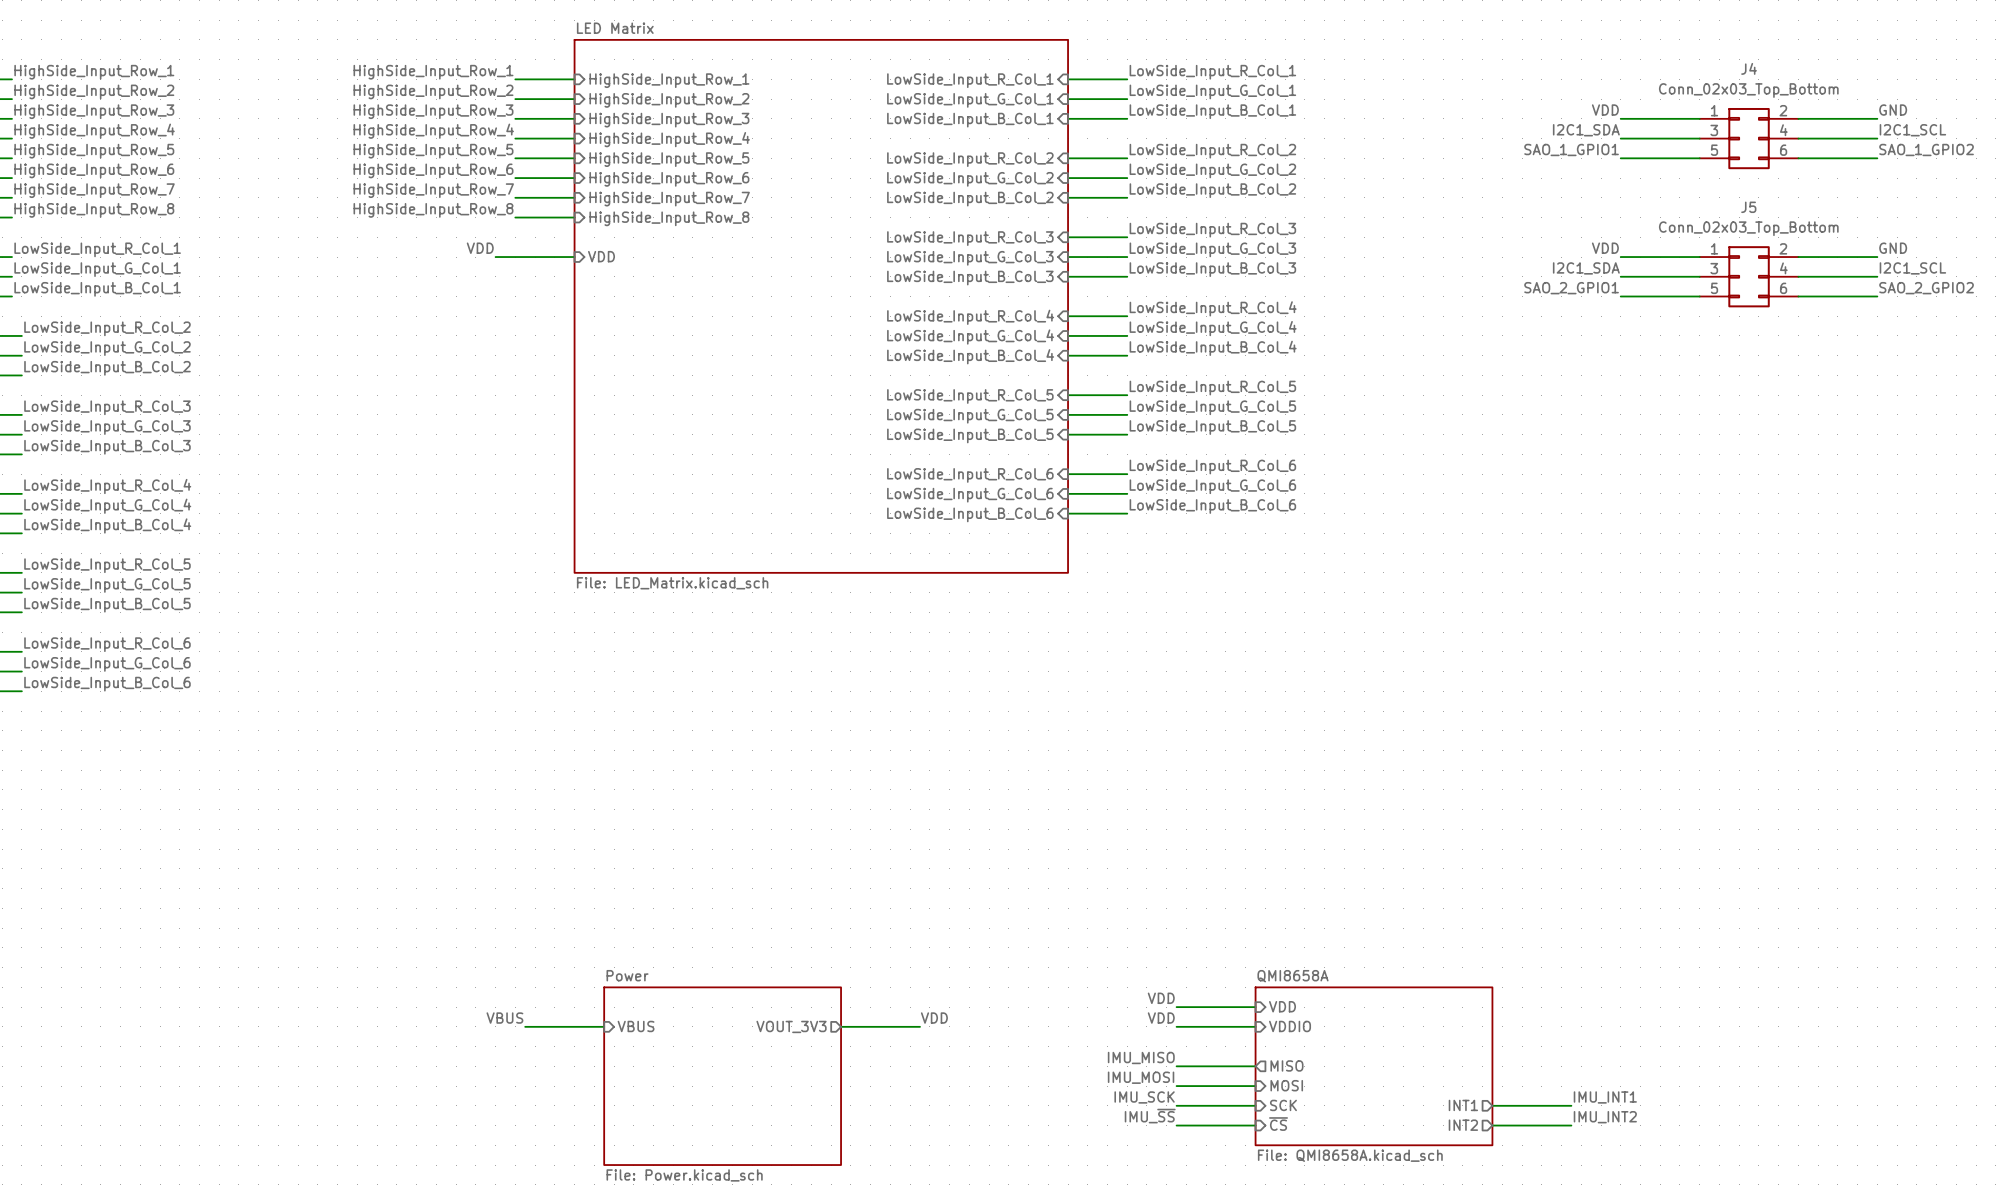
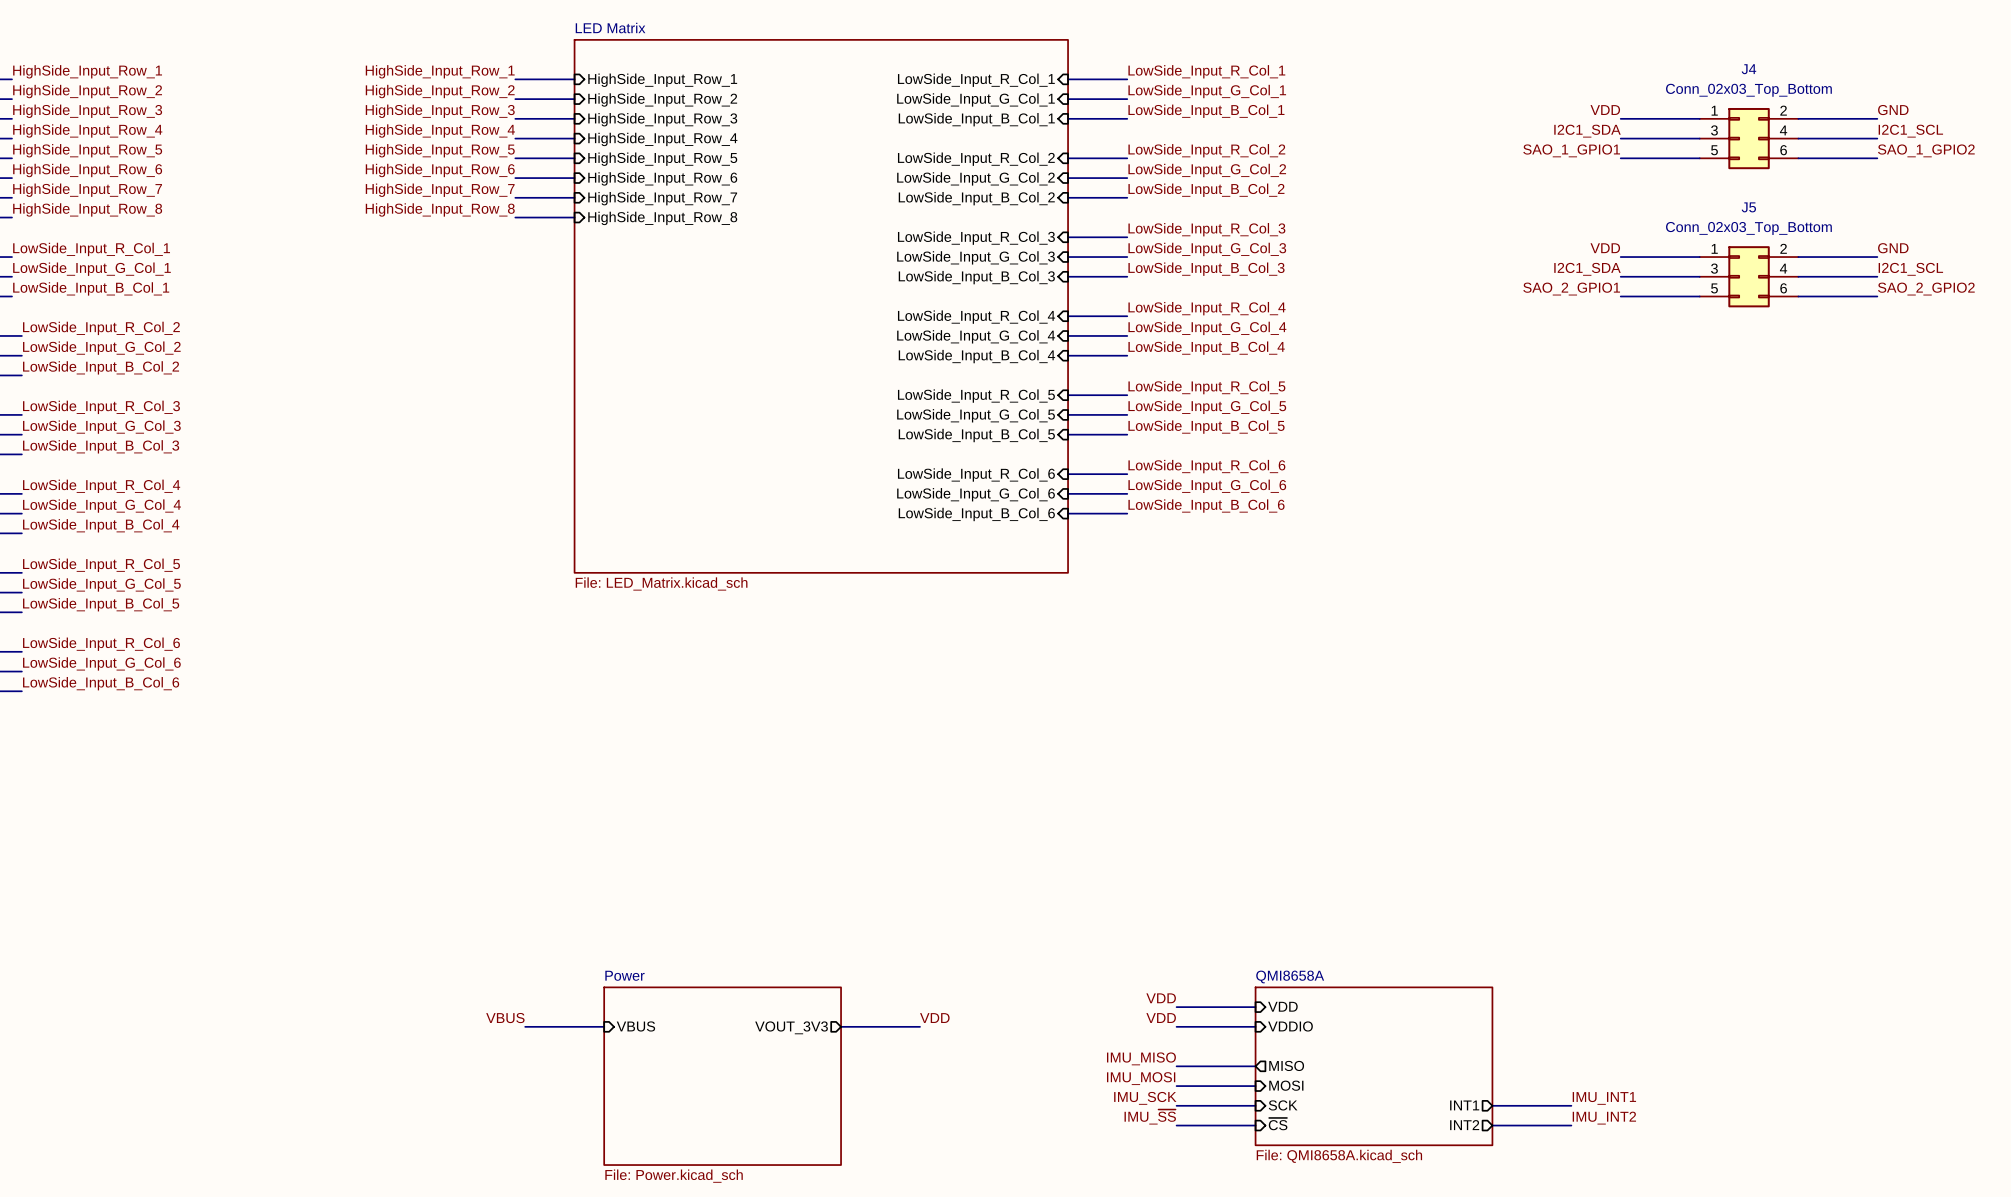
label: VDD (480, 248) -> none
sheet pin: VDD (601, 256) -> none
wire: (495, 257) (574, 257) -> none

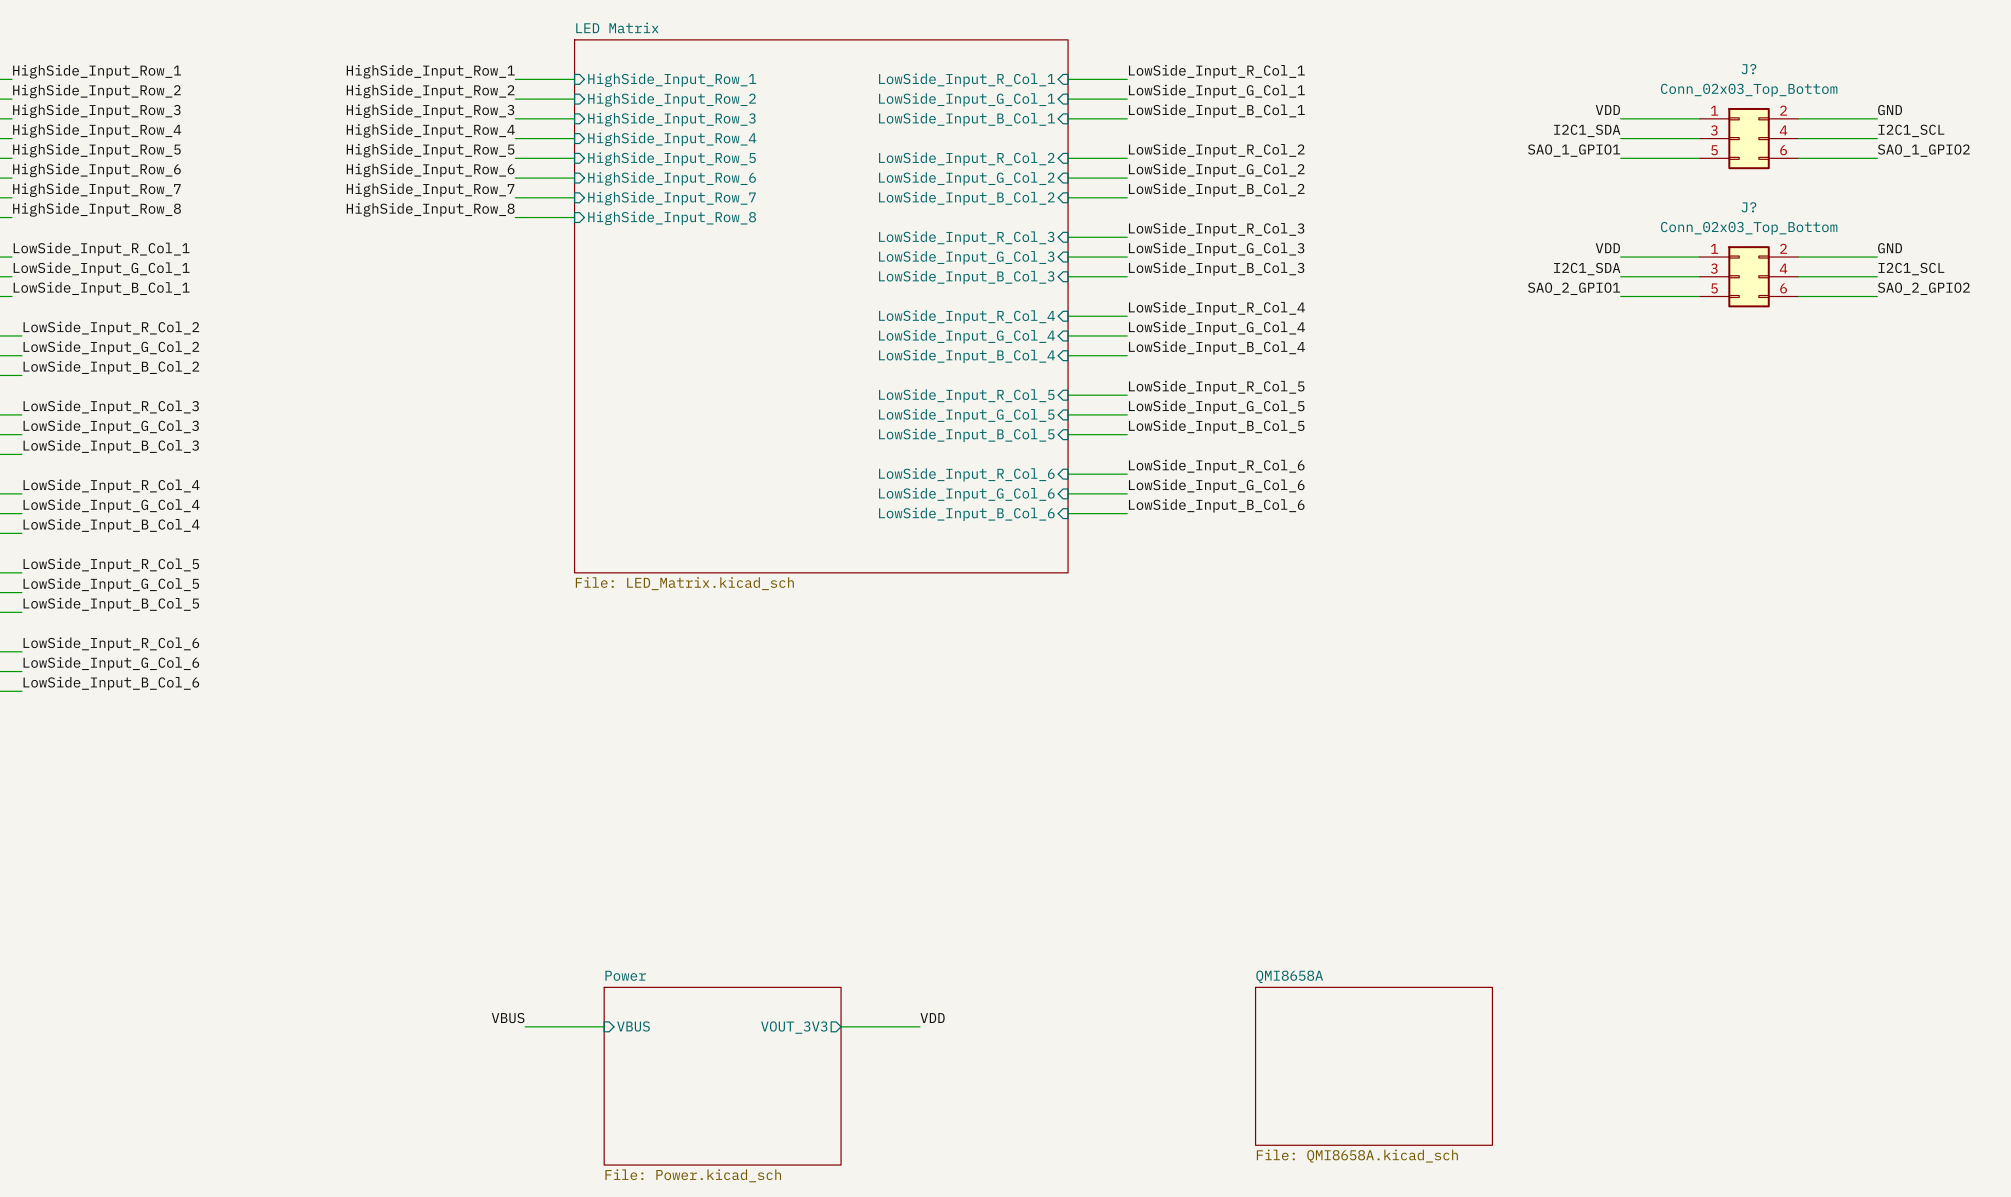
J4 name: J4 (1748, 69) -> J? (1748, 69)
J5 name: J5 (1748, 207) -> J? (1748, 207)
label: VDD (1161, 998) -> none
sheet pin: VDD (1282, 1006) -> none
wire: (1176, 1007) (1255, 1007) -> none
label: VDD (1161, 1018) -> none
wire: (1176, 1026) (1255, 1026) -> none
sheet pin: VDDIO (1290, 1026) -> none
label: IMU_MISO (1141, 1058) -> none
sheet pin: MISO (1286, 1065) -> none
wire: (1176, 1066) (1255, 1066) -> none
label: IMU_MOSI (1141, 1078) -> none
sheet pin: MOSI (1286, 1085) -> none
wire: (1176, 1086) (1255, 1086) -> none
label: IMU_SCK (1145, 1098) -> none
label: IMU_INT1 (1604, 1098) -> none
wire: (1176, 1105) (1255, 1105) -> none
sheet pin: SCK (1283, 1105) -> none
sheet pin: INT1 (1464, 1105) -> none
wire: (1492, 1105) (1571, 1105) -> none
label: IMU_~{SS} (1150, 1117) -> none
label: IMU_INT2 (1604, 1118) -> none
sheet pin: ~{CS} (1278, 1124) -> none
wire: (1176, 1125) (1255, 1125) -> none
sheet pin: INT2 (1464, 1125) -> none
wire: (1492, 1125) (1571, 1125) -> none

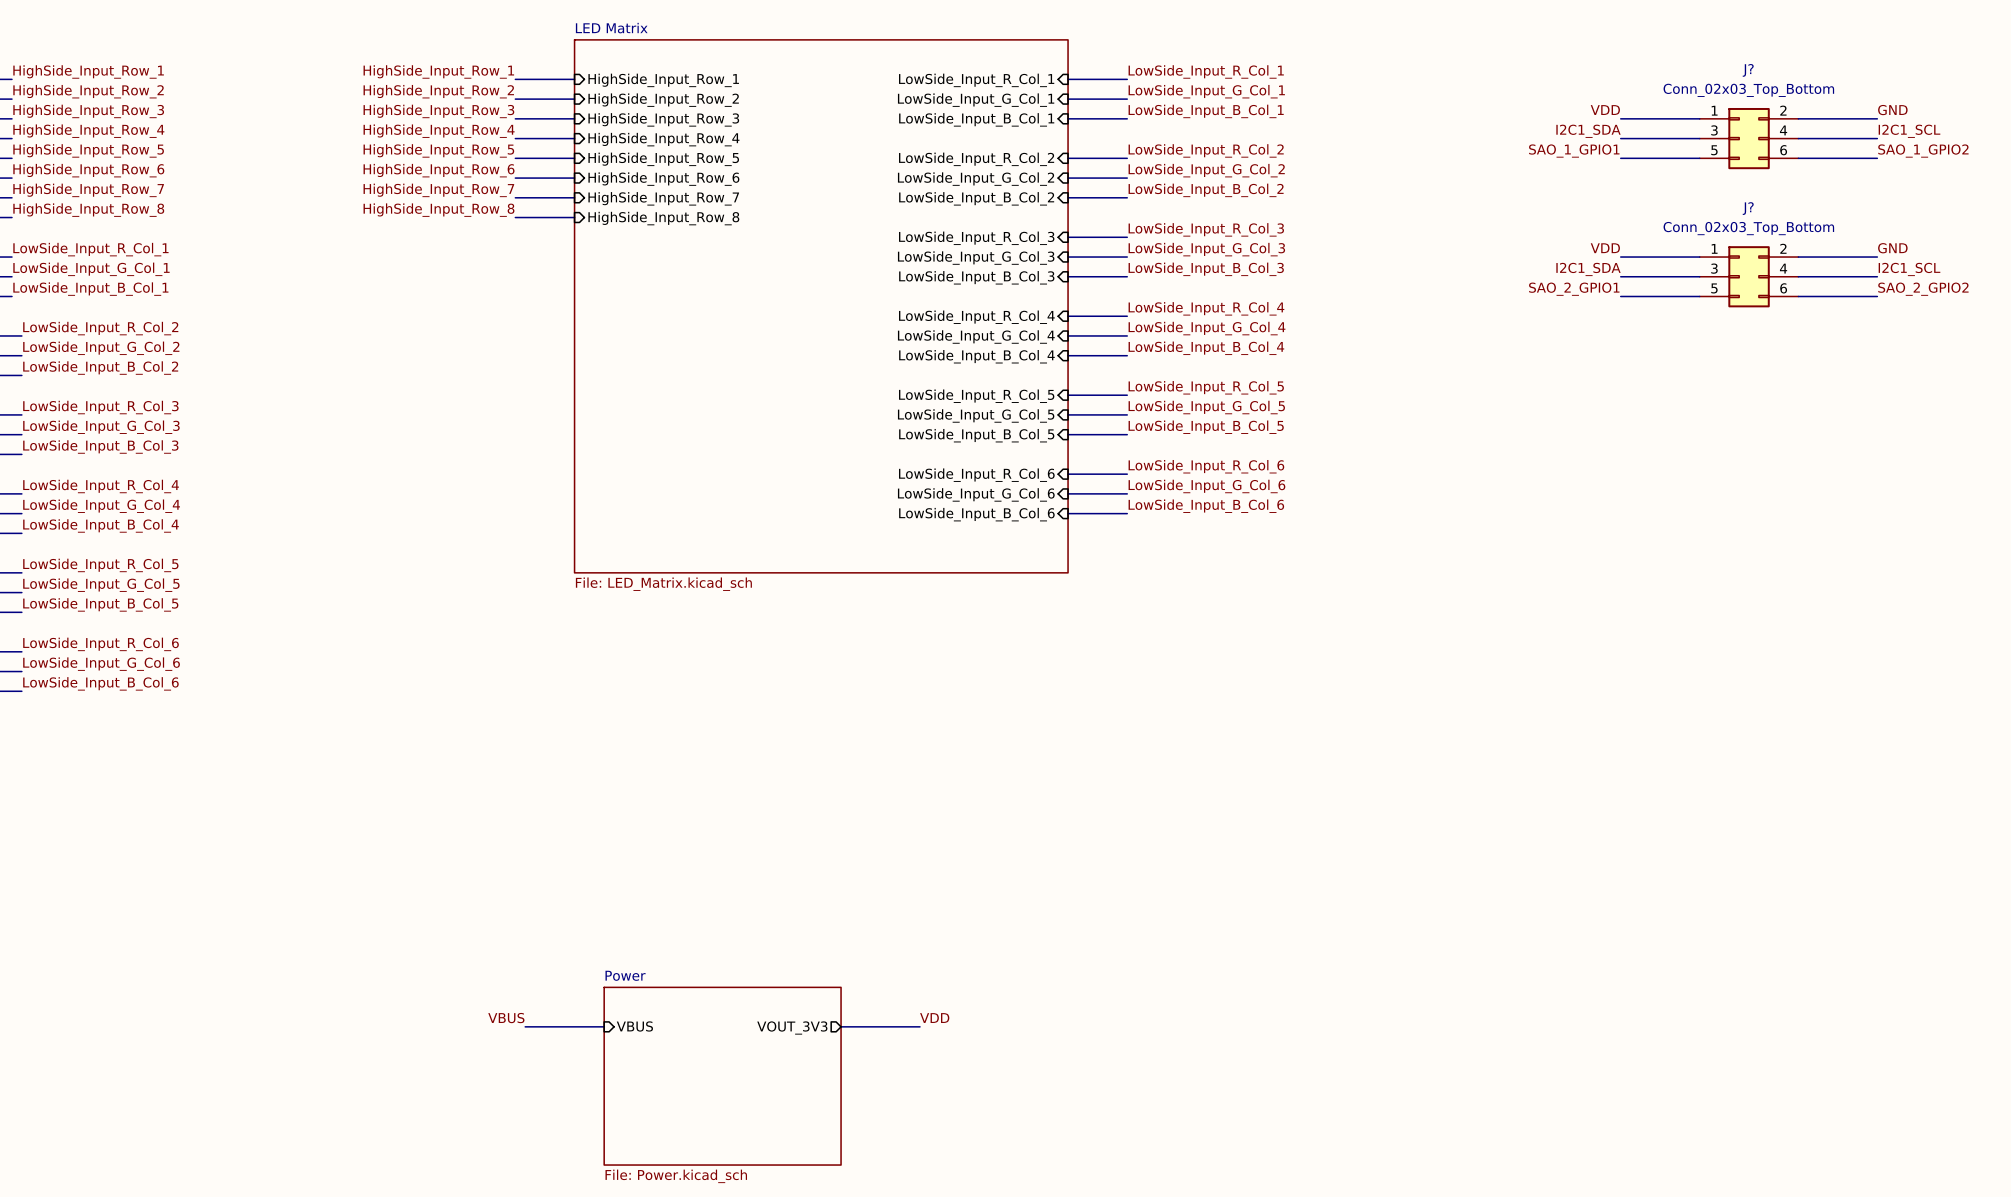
sheet QMI8658A: File: QMI8658A.kicad_sch (1374, 1066) -> none

